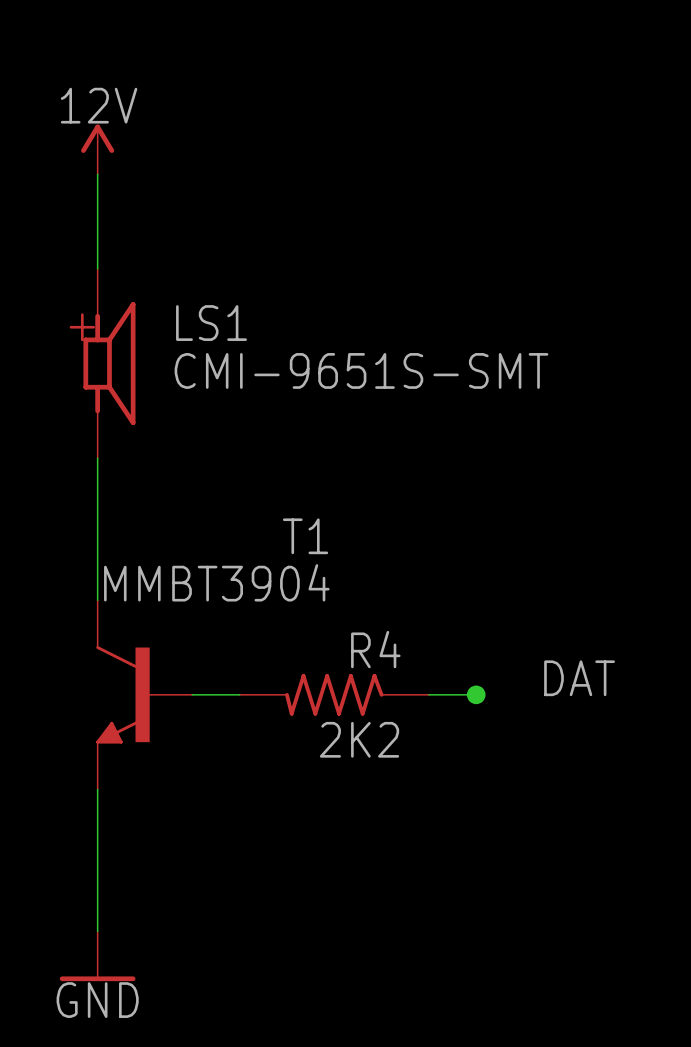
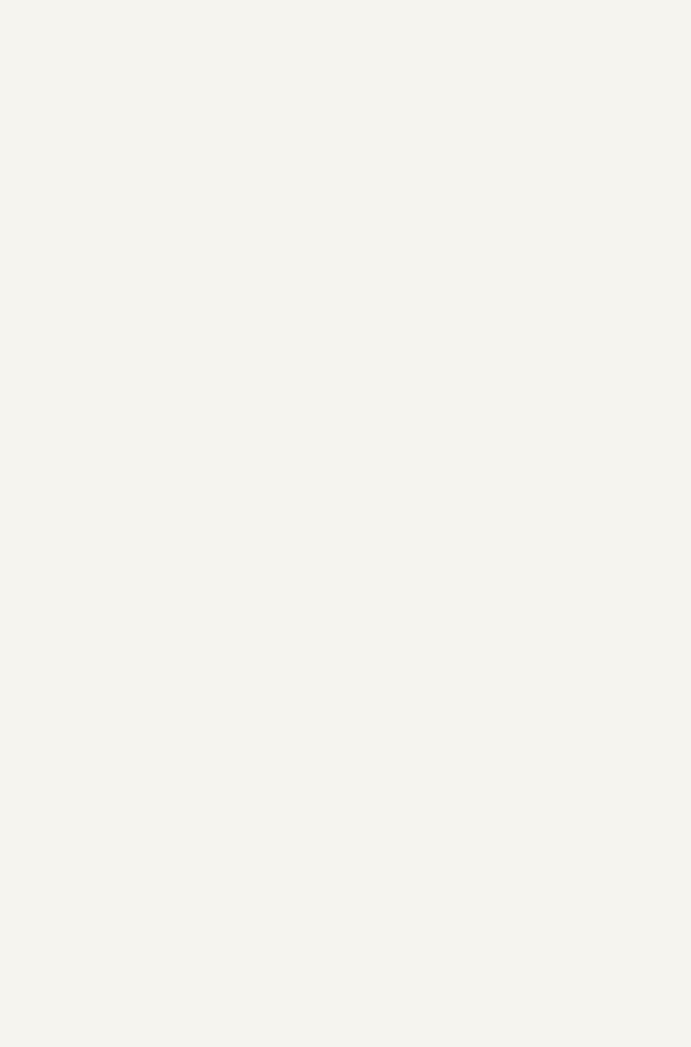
power symbol: 12V (97, 149) -> none
wire: (97, 174) (97, 268) -> none
LS1: CMI-9651S-SMT (109, 363) -> none
wire: (97, 458) (97, 600) -> none
label: DAT (579, 678) -> none
T1: MMBT3904 (144, 694) -> none
wire: (192, 694) (239, 694) -> none
R4: 2K2 (334, 694) -> none
wire: (428, 694) (476, 694) -> none
junction: (476, 694) -> none
wire: (97, 789) (97, 931) -> none
power symbol: GND (97, 956) -> none

